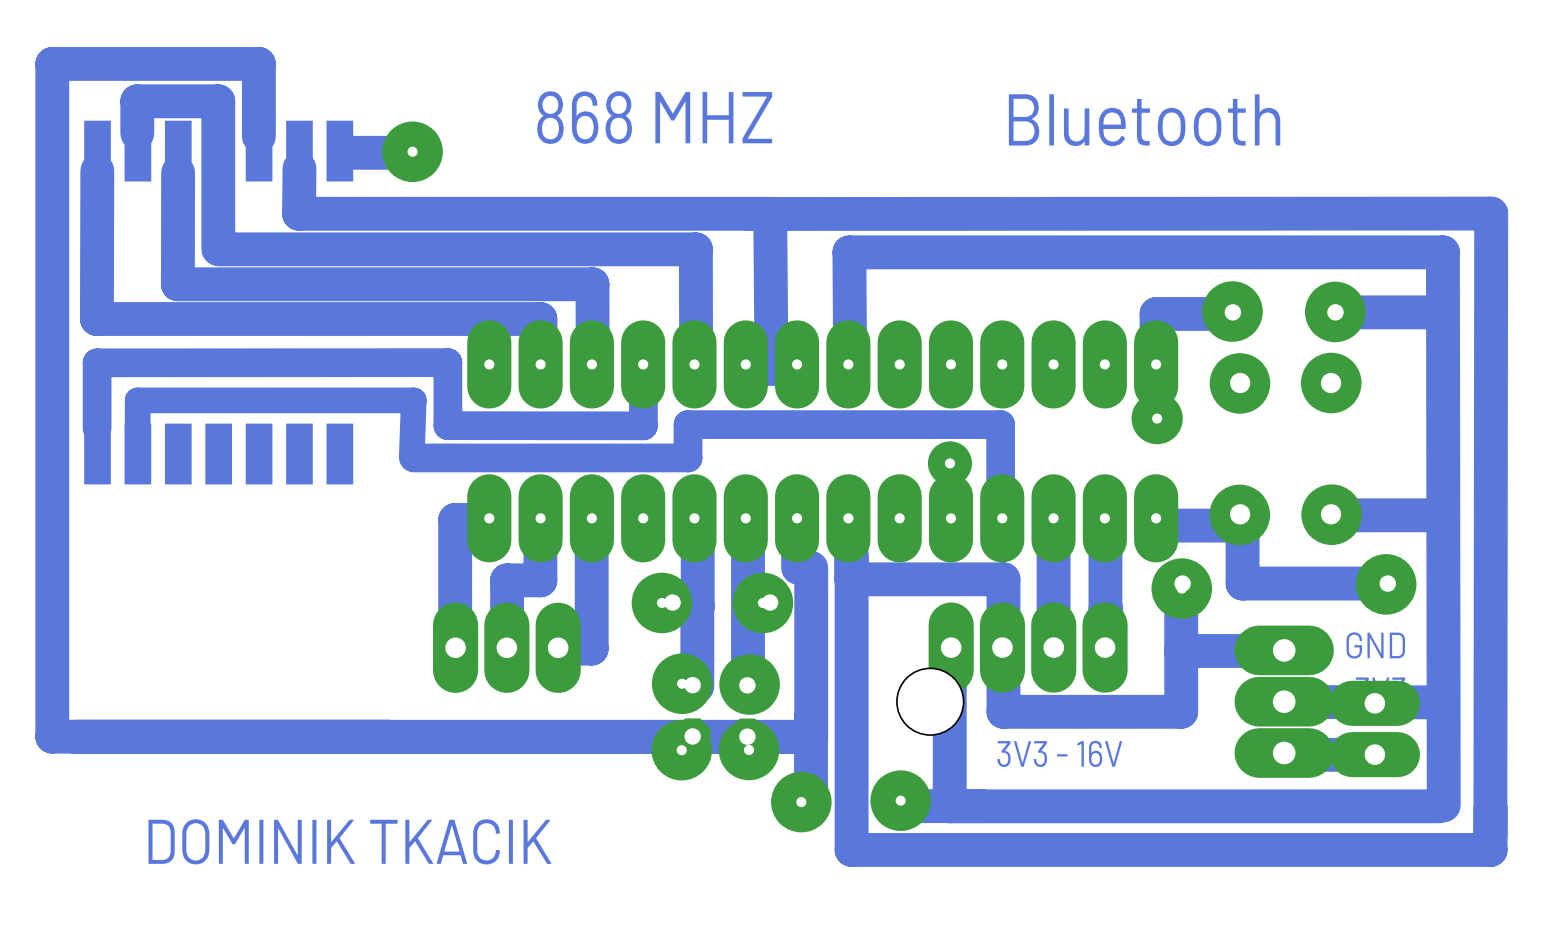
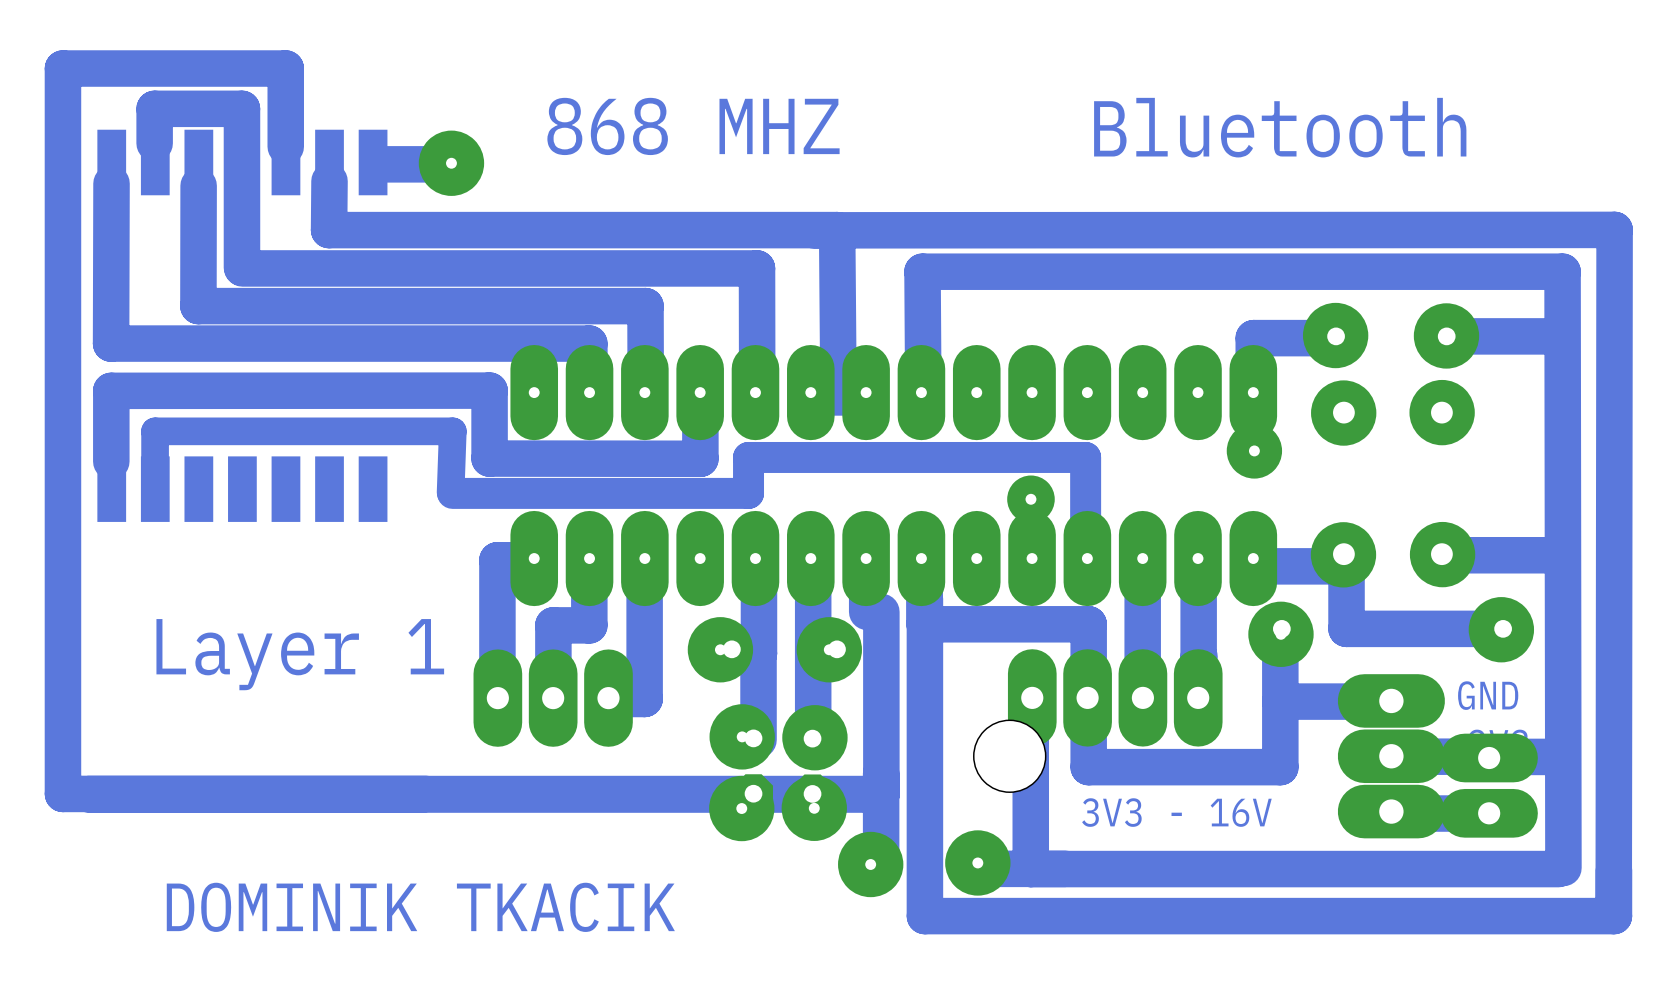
track width: thin (643, 368) (643, 425) (447, 425) (447, 362) (97, 362) (97, 428) -> thick (700, 397) (700, 458) (489, 458) (489, 390) (111, 390) (111, 461)
text: none -> Layer 1 (300, 654)

